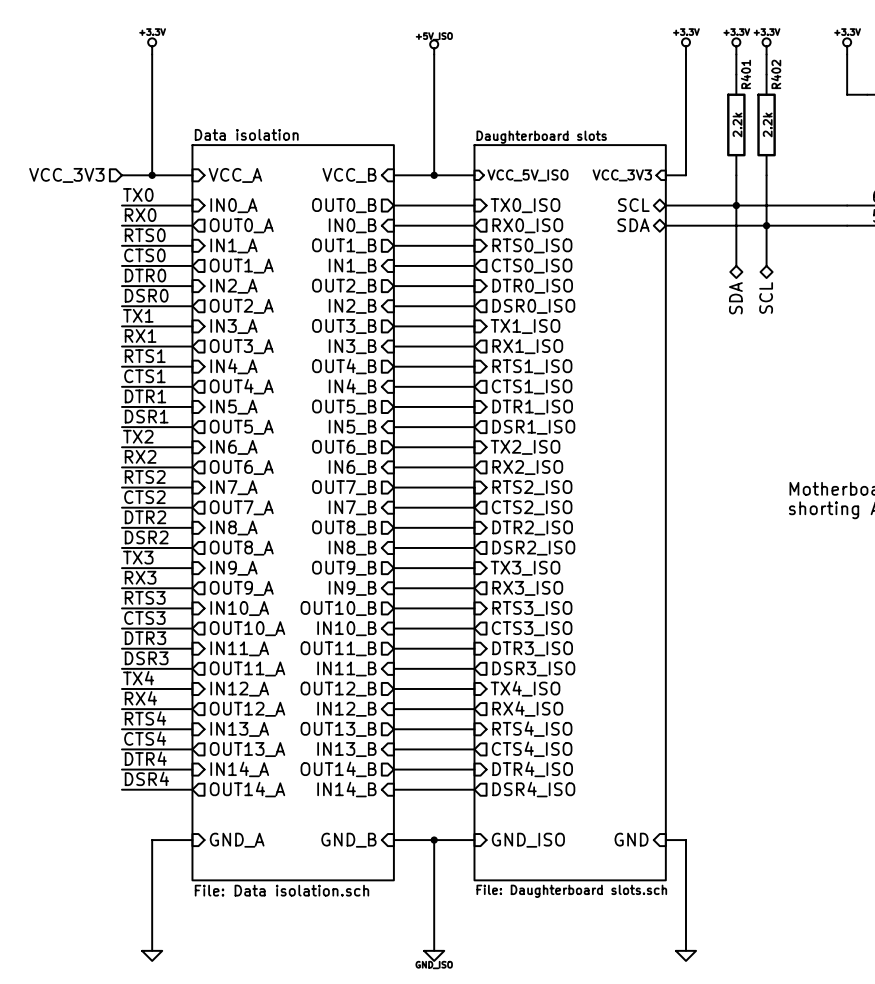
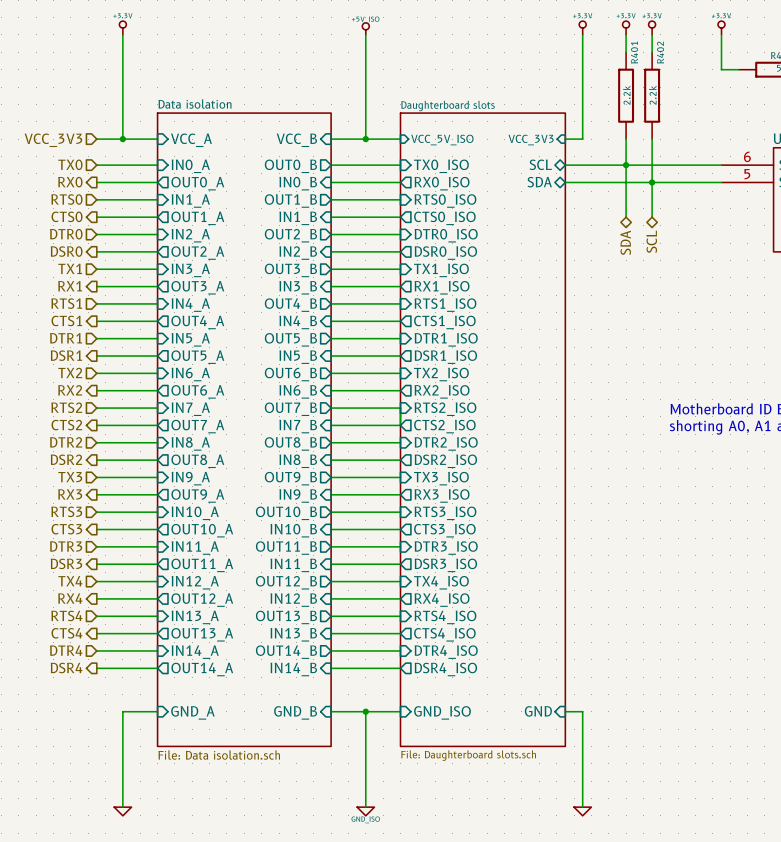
label: TX0 (138, 194) -> none
hierarchical label: none -> TX0 (70, 164)
label: RX0 (140, 215) -> none
hierarchical label: none -> RX0 (70, 182)
label: RTS0 (145, 235) -> none
hierarchical label: none -> RTS0 (66, 199)
label: CTS0 (144, 255) -> none
hierarchical label: none -> CTS0 (67, 216)
label: DTR0 (145, 275) -> none
hierarchical label: none -> DTR0 (66, 234)
label: DSR0 (146, 295) -> none
hierarchical label: none -> DSR0 (66, 251)
label: TX1 (138, 315) -> none
hierarchical label: none -> TX1 (70, 268)
label: RX1 (140, 336) -> none
hierarchical label: none -> RX1 (70, 286)
label: RTS1 (145, 356) -> none
hierarchical label: none -> RTS1 (66, 303)
label: CTS1 (144, 376) -> none
hierarchical label: none -> CTS1 (66, 320)
label: DTR1 (145, 396) -> none
hierarchical label: none -> DTR1 (66, 338)
label: DSR1 (146, 416) -> none
hierarchical label: none -> DSR1 (66, 355)
label: TX2 (138, 436) -> none
hierarchical label: none -> TX2 (70, 372)
label: RX2 (140, 456) -> none
hierarchical label: none -> RX2 (70, 390)
label: RTS2 (145, 477) -> none
hierarchical label: none -> RTS2 (66, 407)
label: CTS2 (144, 497) -> none
hierarchical label: none -> CTS2 (66, 425)
label: DTR2 (145, 517) -> none
hierarchical label: none -> DTR2 (66, 442)
label: DSR2 (146, 537) -> none
hierarchical label: none -> DSR2 (66, 459)
label: TX3 (138, 557) -> none
hierarchical label: none -> TX3 (70, 477)
label: RX3 (140, 577) -> none
hierarchical label: none -> RX3 (70, 494)
label: RTS3 (145, 597) -> none
hierarchical label: none -> RTS3 (66, 511)
label: CTS3 (144, 618) -> none
hierarchical label: none -> CTS3 (66, 529)
label: DTR3 (145, 638) -> none
hierarchical label: none -> DTR3 (66, 546)
label: DSR3 (146, 658) -> none
hierarchical label: none -> DSR3 (66, 563)
label: TX4 (138, 678) -> none
hierarchical label: none -> TX4 (70, 581)
label: RX4 (140, 698) -> none
hierarchical label: none -> RX4 (70, 598)
label: RTS4 (145, 718) -> none
hierarchical label: none -> RTS4 (66, 615)
label: CTS4 (145, 738) -> none
hierarchical label: none -> CTS4 (67, 633)
label: DTR4 (145, 758) -> none
hierarchical label: none -> DTR4 (66, 650)
label: DSR4 (146, 778) -> none
hierarchical label: none -> DSR4 (66, 668)

